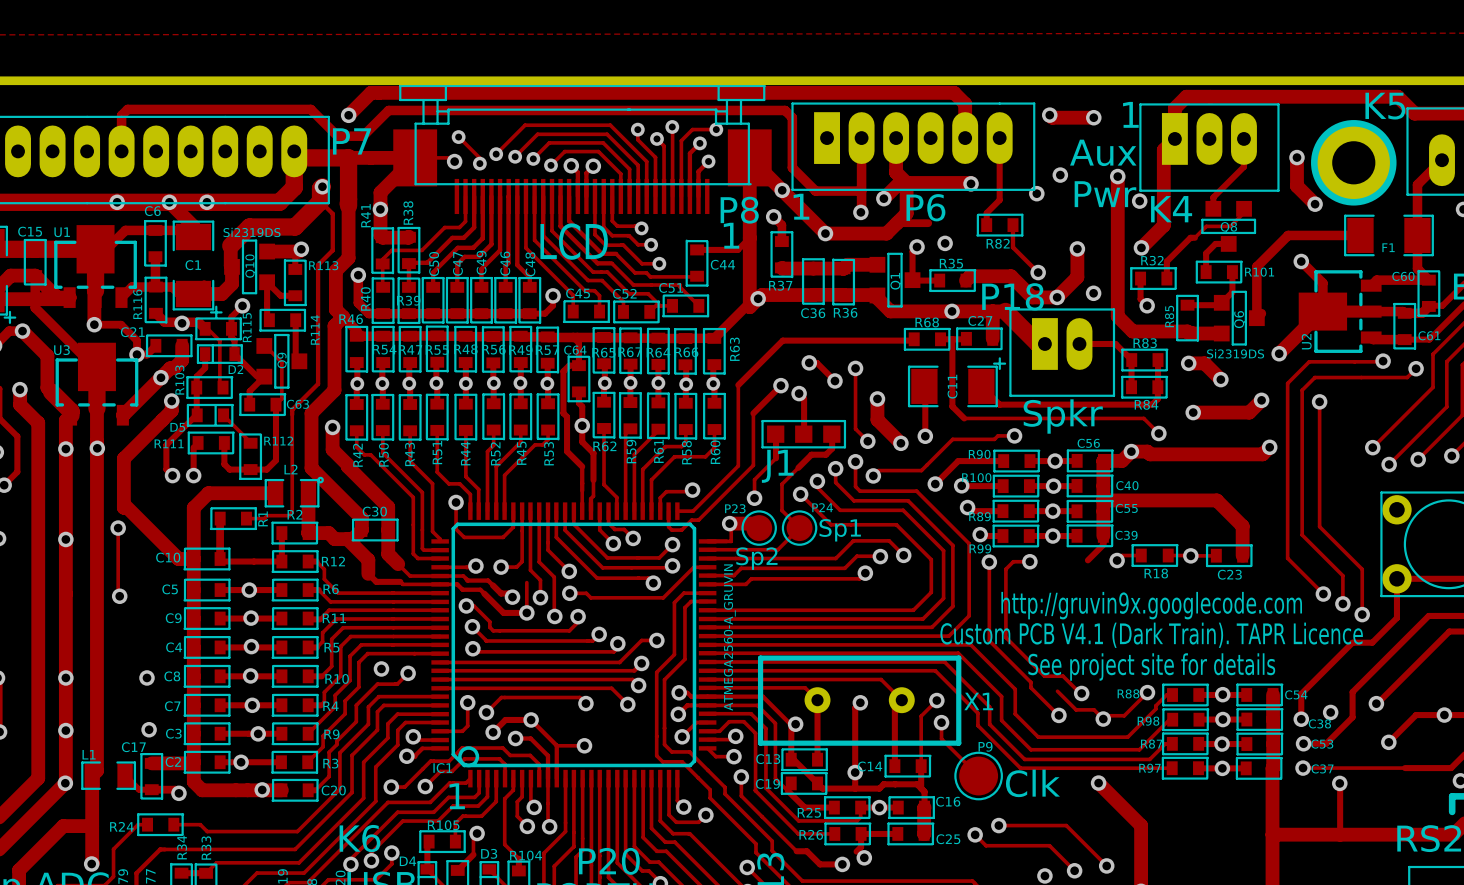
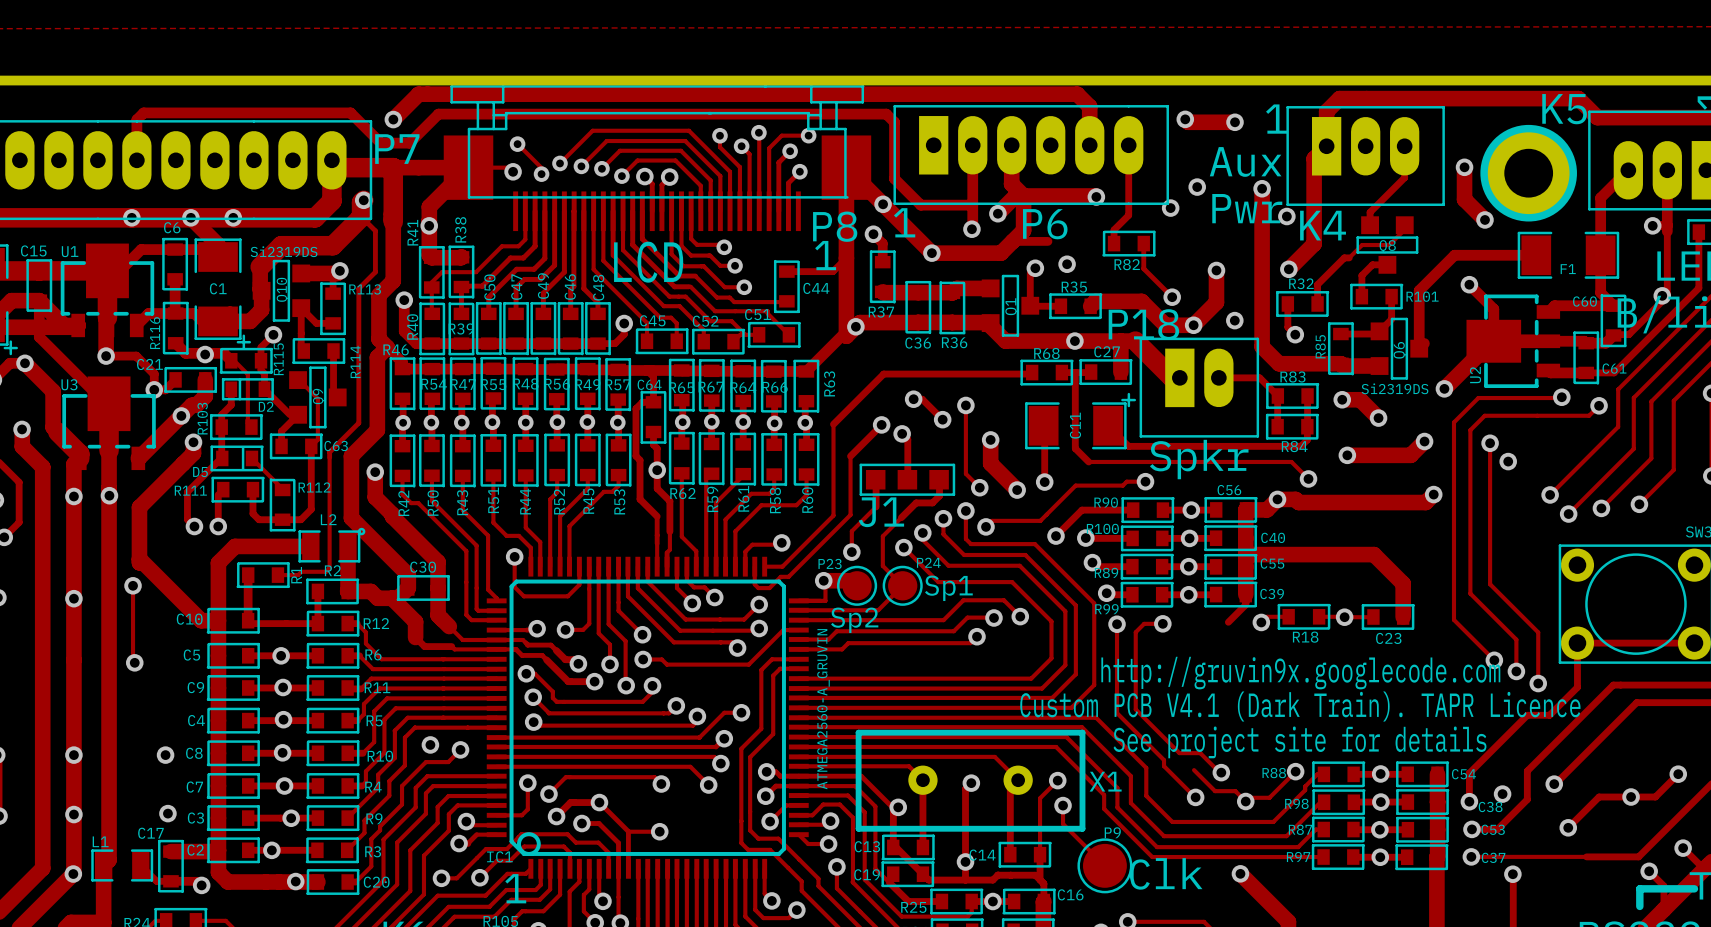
via: none -> (1508, 461)
track: (526, 582) (526, 612) -> none

